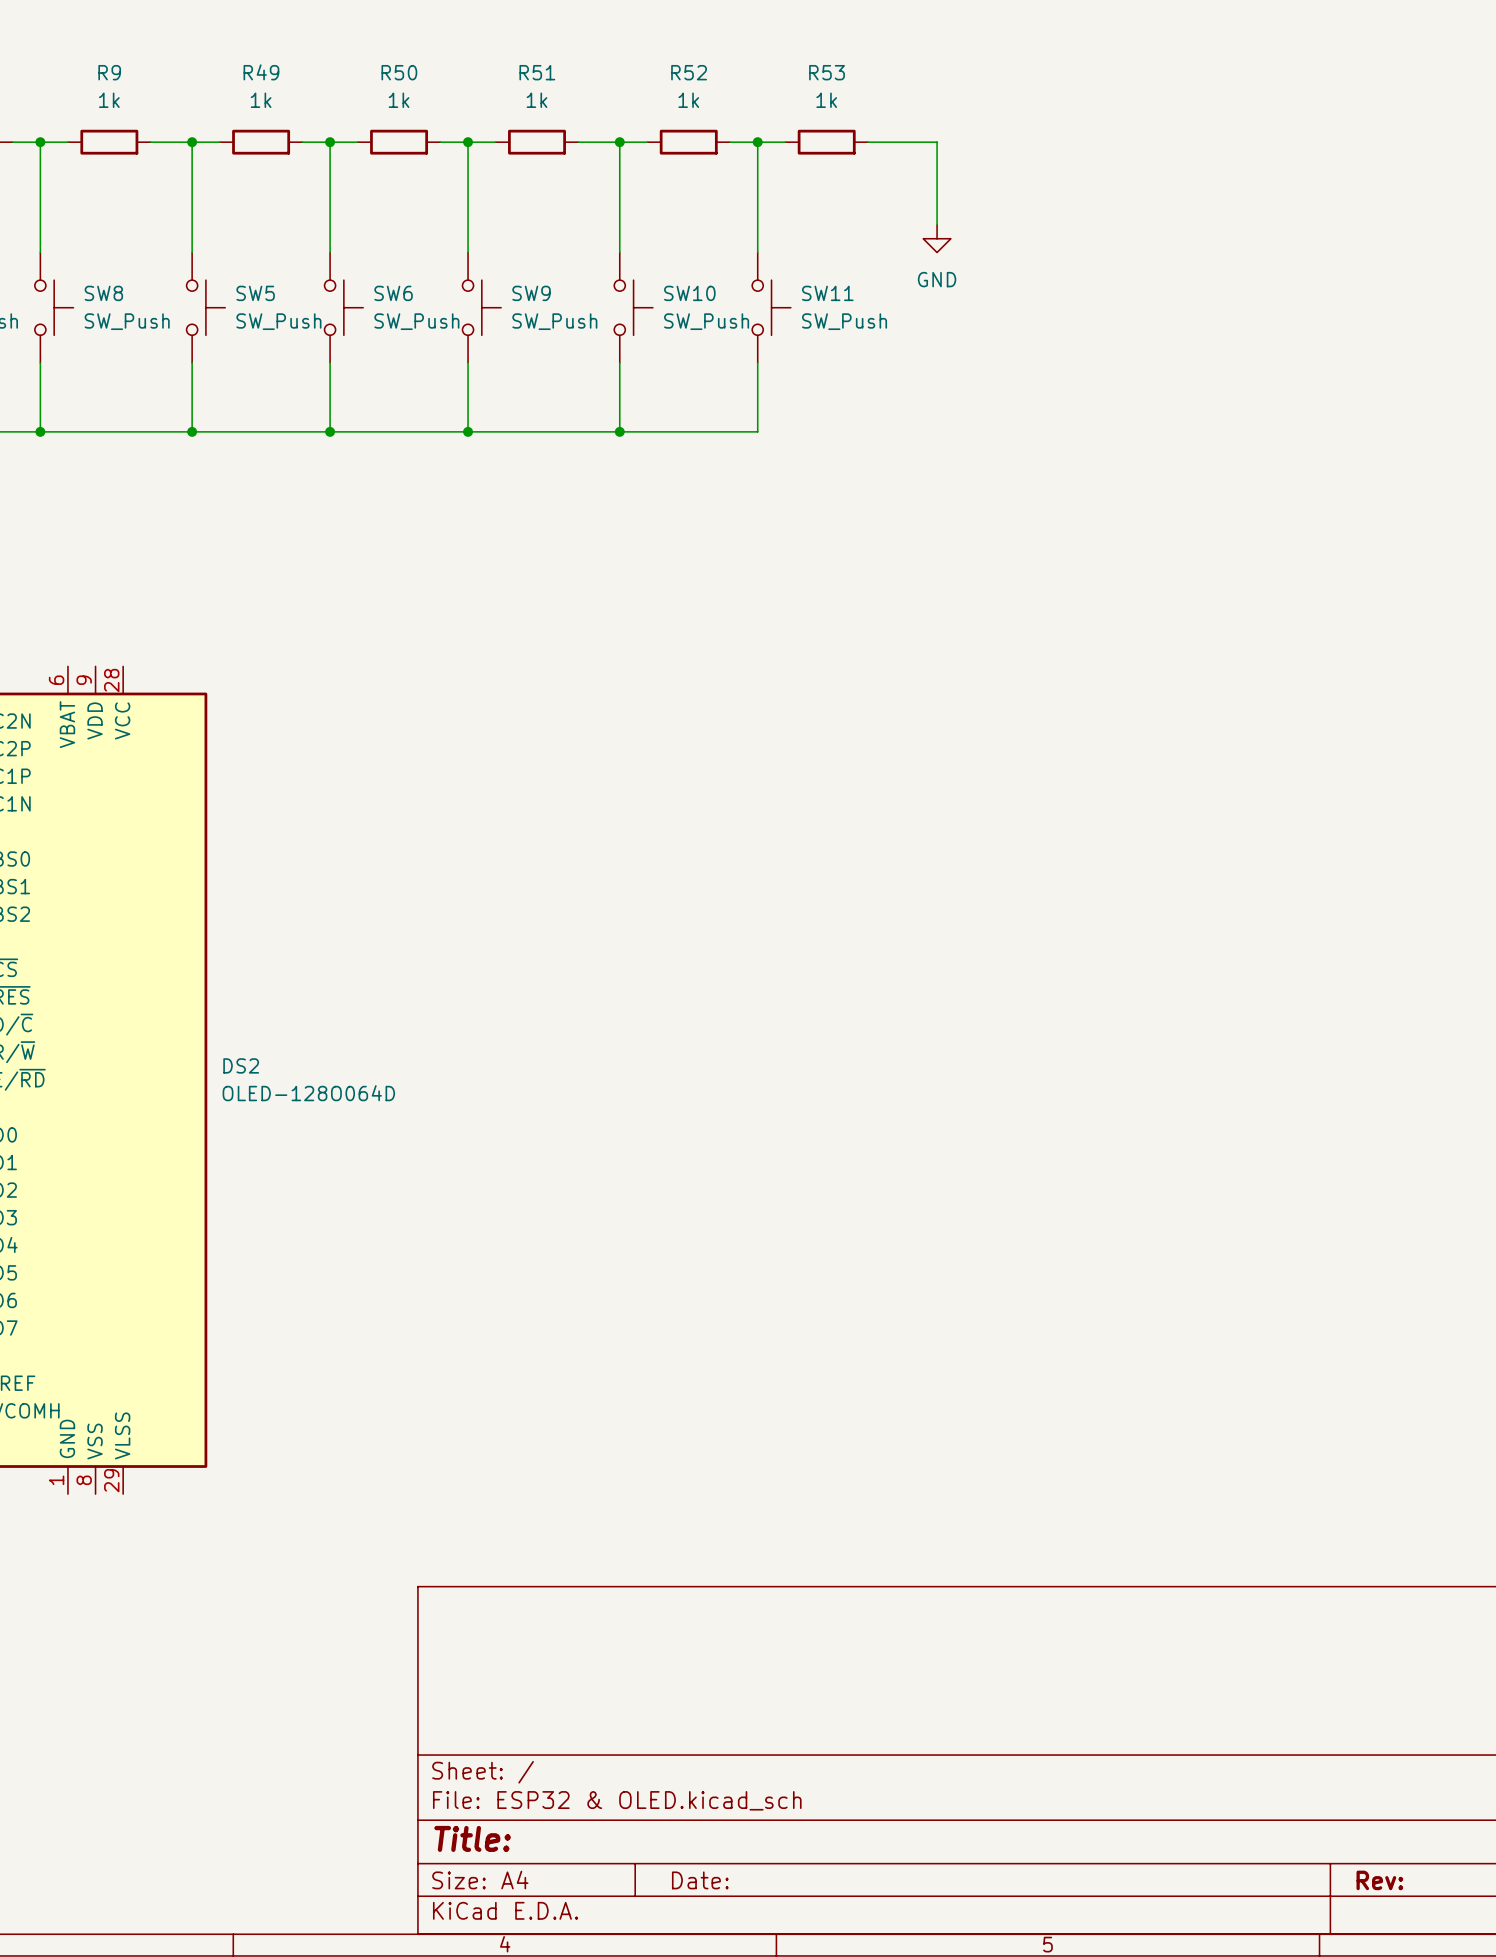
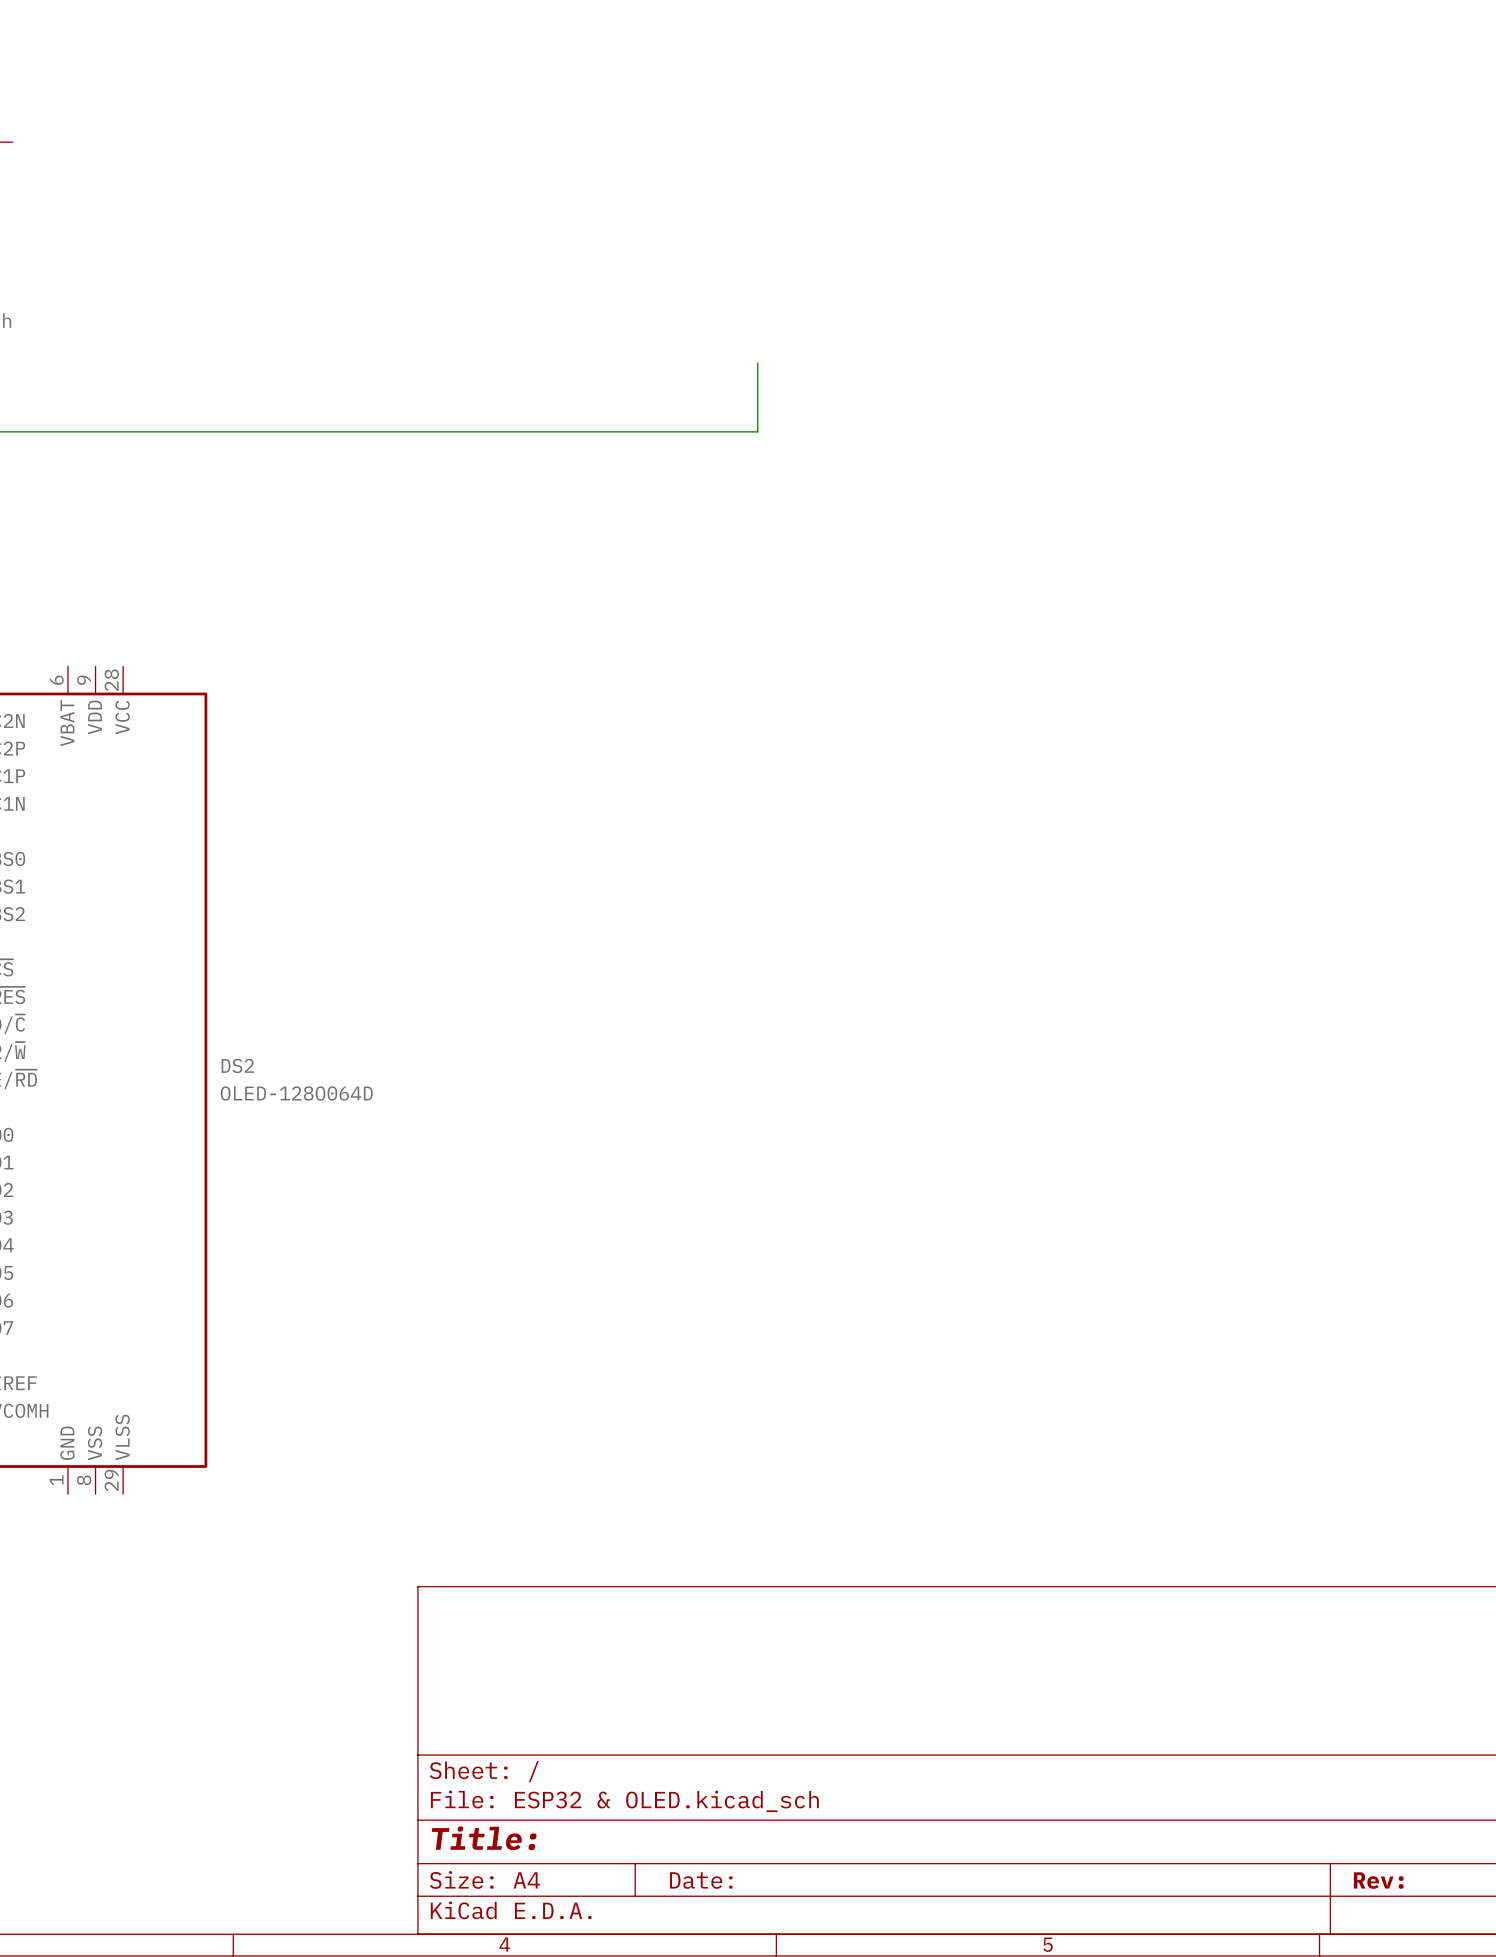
wire: (12, 142) (67, 142) -> none
wire: (40, 142) (40, 252) -> none
junction: (40, 142) -> none
R9: 1k (109, 142) -> none
wire: (150, 142) (219, 142) -> none
wire: (192, 142) (192, 252) -> none
junction: (192, 142) -> none
R49: 1k (261, 142) -> none
wire: (302, 142) (357, 142) -> none
wire: (330, 142) (330, 252) -> none
junction: (330, 142) -> none
R50: 1k (399, 142) -> none
wire: (440, 142) (495, 142) -> none
wire: (468, 142) (468, 252) -> none
junction: (468, 142) -> none
R51: 1k (537, 142) -> none
wire: (578, 142) (647, 142) -> none
wire: (619, 142) (619, 252) -> none
junction: (619, 142) -> none
R52: 1k (688, 142) -> none
wire: (730, 142) (785, 142) -> none
wire: (757, 142) (757, 252) -> none
junction: (757, 142) -> none
R53: 1k (826, 142) -> none
wire: (868, 142) (937, 142) (937, 224) -> none
power symbol: GND (937, 238) -> none
SW8: SW_Push (54, 307) -> none
SW5: SW_Push (205, 307) -> none
SW6: SW_Push (343, 307) -> none
SW9: SW_Push (481, 307) -> none
SW10: SW_Push (633, 307) -> none
SW11: SW_Push (771, 307) -> none
wire: (40, 362) (40, 431) -> none
wire: (192, 362) (192, 431) -> none
wire: (330, 362) (330, 431) -> none
wire: (468, 362) (468, 431) -> none
wire: (619, 362) (619, 431) -> none
junction: (40, 431) -> none
junction: (192, 431) -> none
junction: (330, 431) -> none
junction: (468, 431) -> none
junction: (619, 431) -> none

